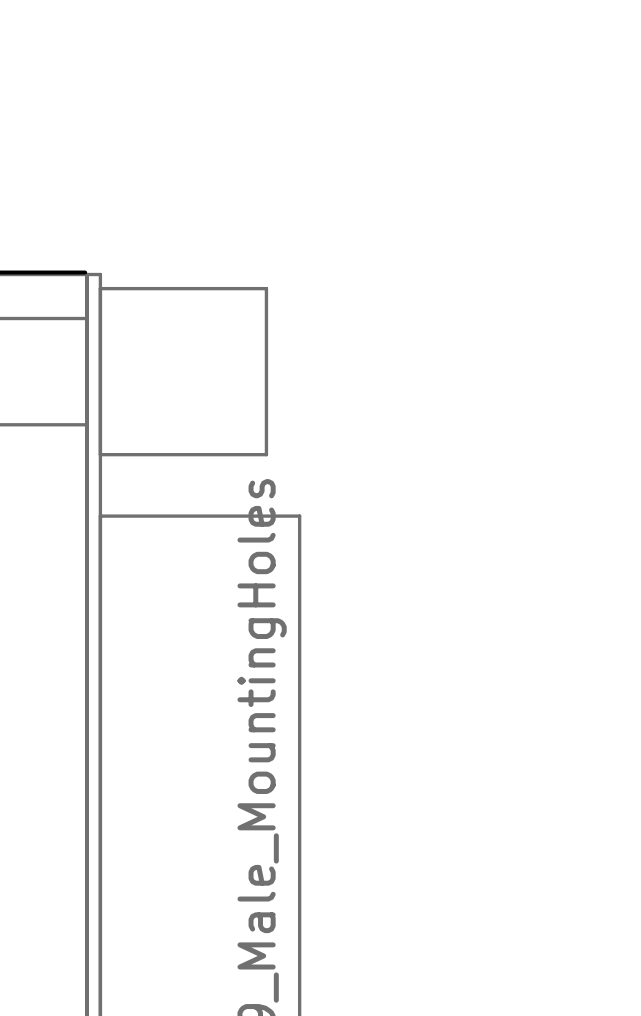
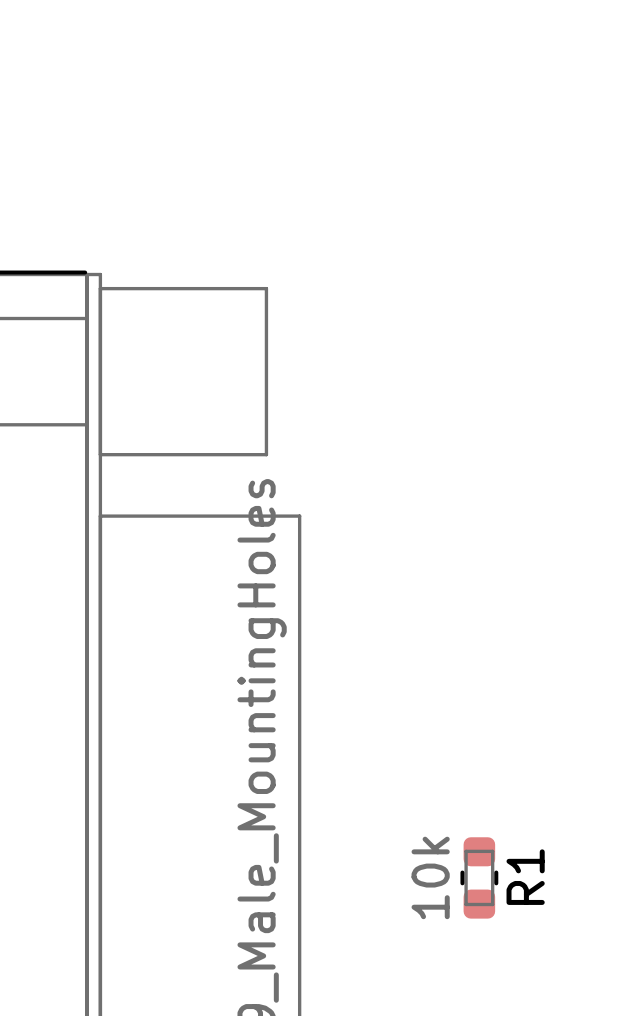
R1: none -> 10k (479, 877)

